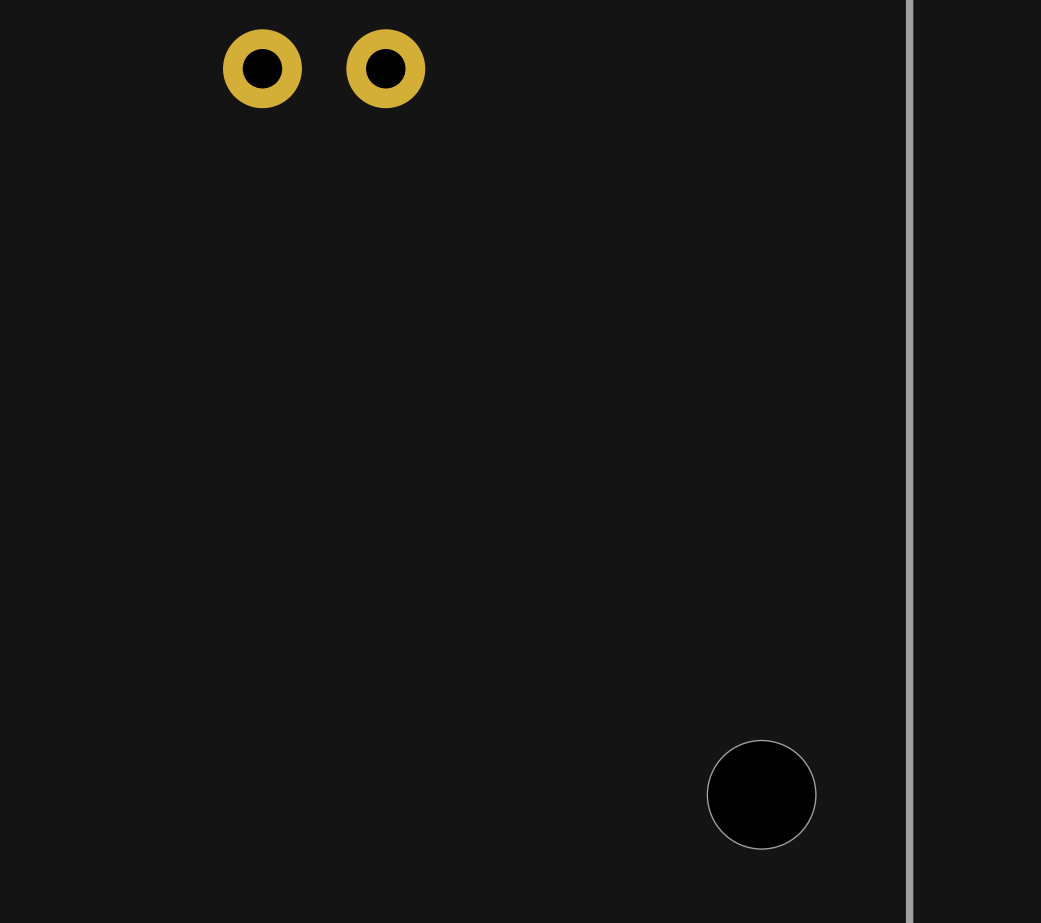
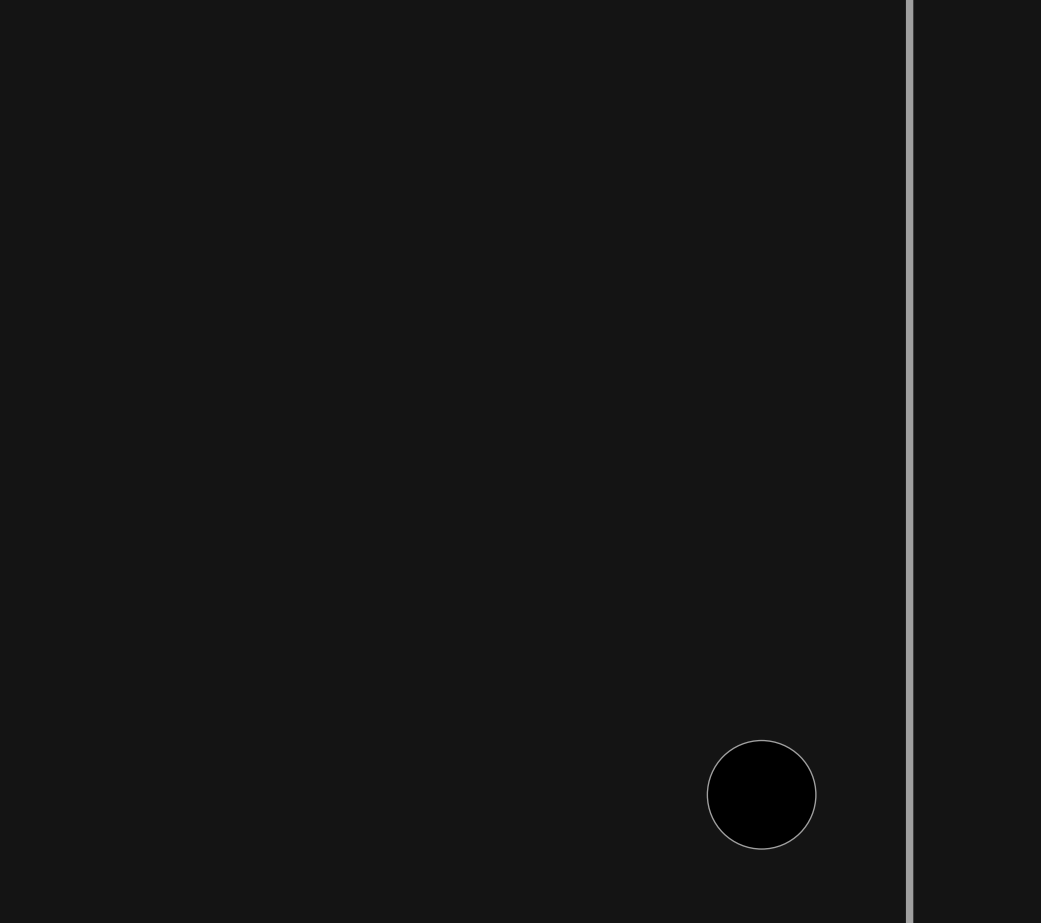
part: (324, 68) -> none

